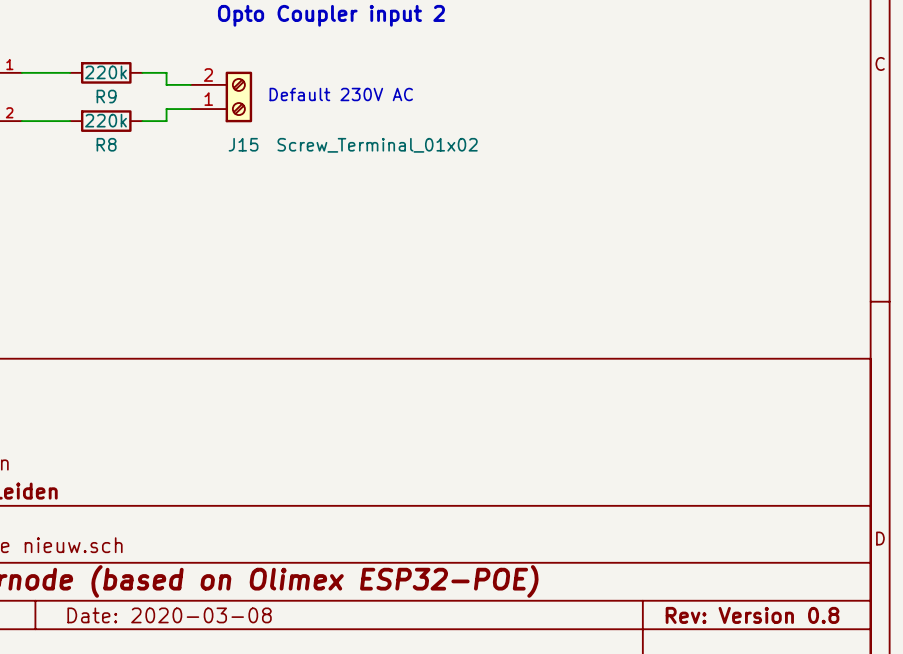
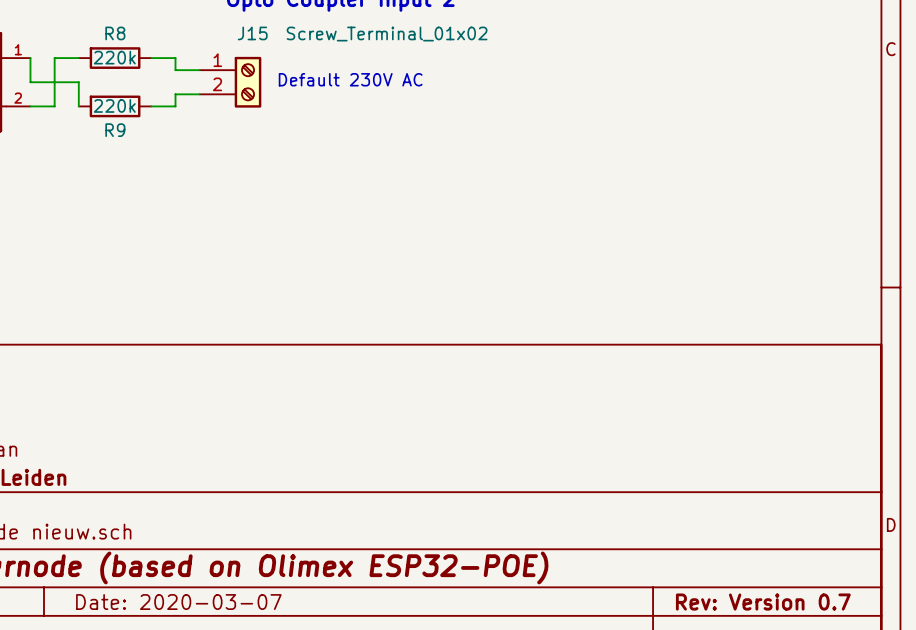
wire: (21, 72) (46, 72) -> (30, 58) (30, 82) (78, 82) (78, 106)
R9 name: R9 (106, 96) -> R8 (115, 33)
J15 flip: as is (238, 96) -> up-down (248, 82)
wire: (46, 121) (70, 121) -> (54, 106) (54, 58)
R8 name: R8 (106, 144) -> R9 (115, 130)
title block: Date: 2020-03-08 (169, 615) -> Date: 2020-03-07 (178, 602)
title block: Rev: Version 0.8 (752, 615) -> Rev: Version 0.7 (763, 602)

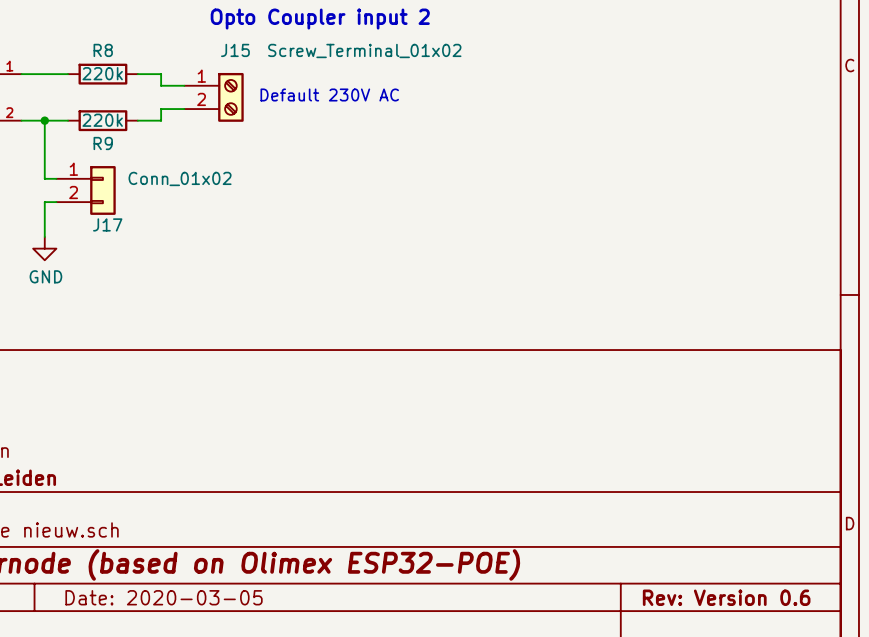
wire: (30, 58) (30, 82) (78, 82) (78, 106) -> (21, 74) (44, 74)
wire: (54, 58) (54, 106) -> none
junction: none -> (44, 120)
wire: none -> (68, 120) (44, 120) (44, 178) (56, 178)
J17: none -> Conn_01x02 (86, 190)
wire: none -> (56, 202) (44, 202) (44, 237)
power symbol: none -> GND (44, 248)
title block: Date: 2020-03-07 (178, 602) -> Date: 2020-03-05 (164, 597)
title block: Rev: Version 0.7 (763, 602) -> Rev: Version 0.6 (726, 597)

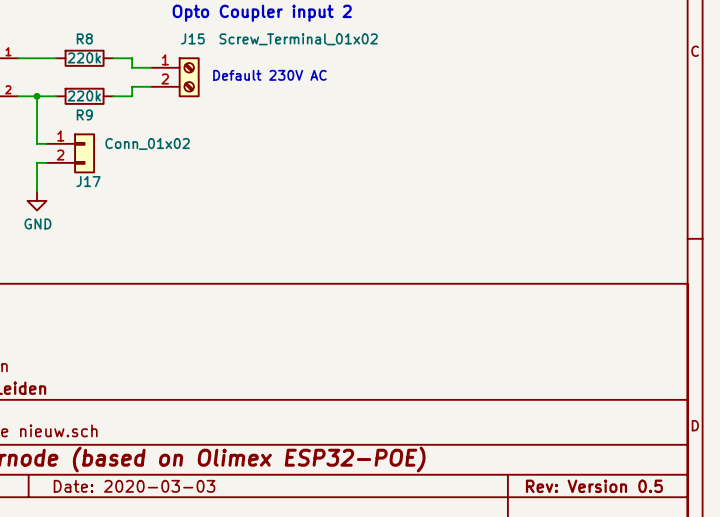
title block: Date: 2020-03-05 (164, 597) -> Date: 2020-03-03 (134, 486)
title block: Rev: Version 0.6 (726, 597) -> Rev: Version 0.5 (594, 486)

